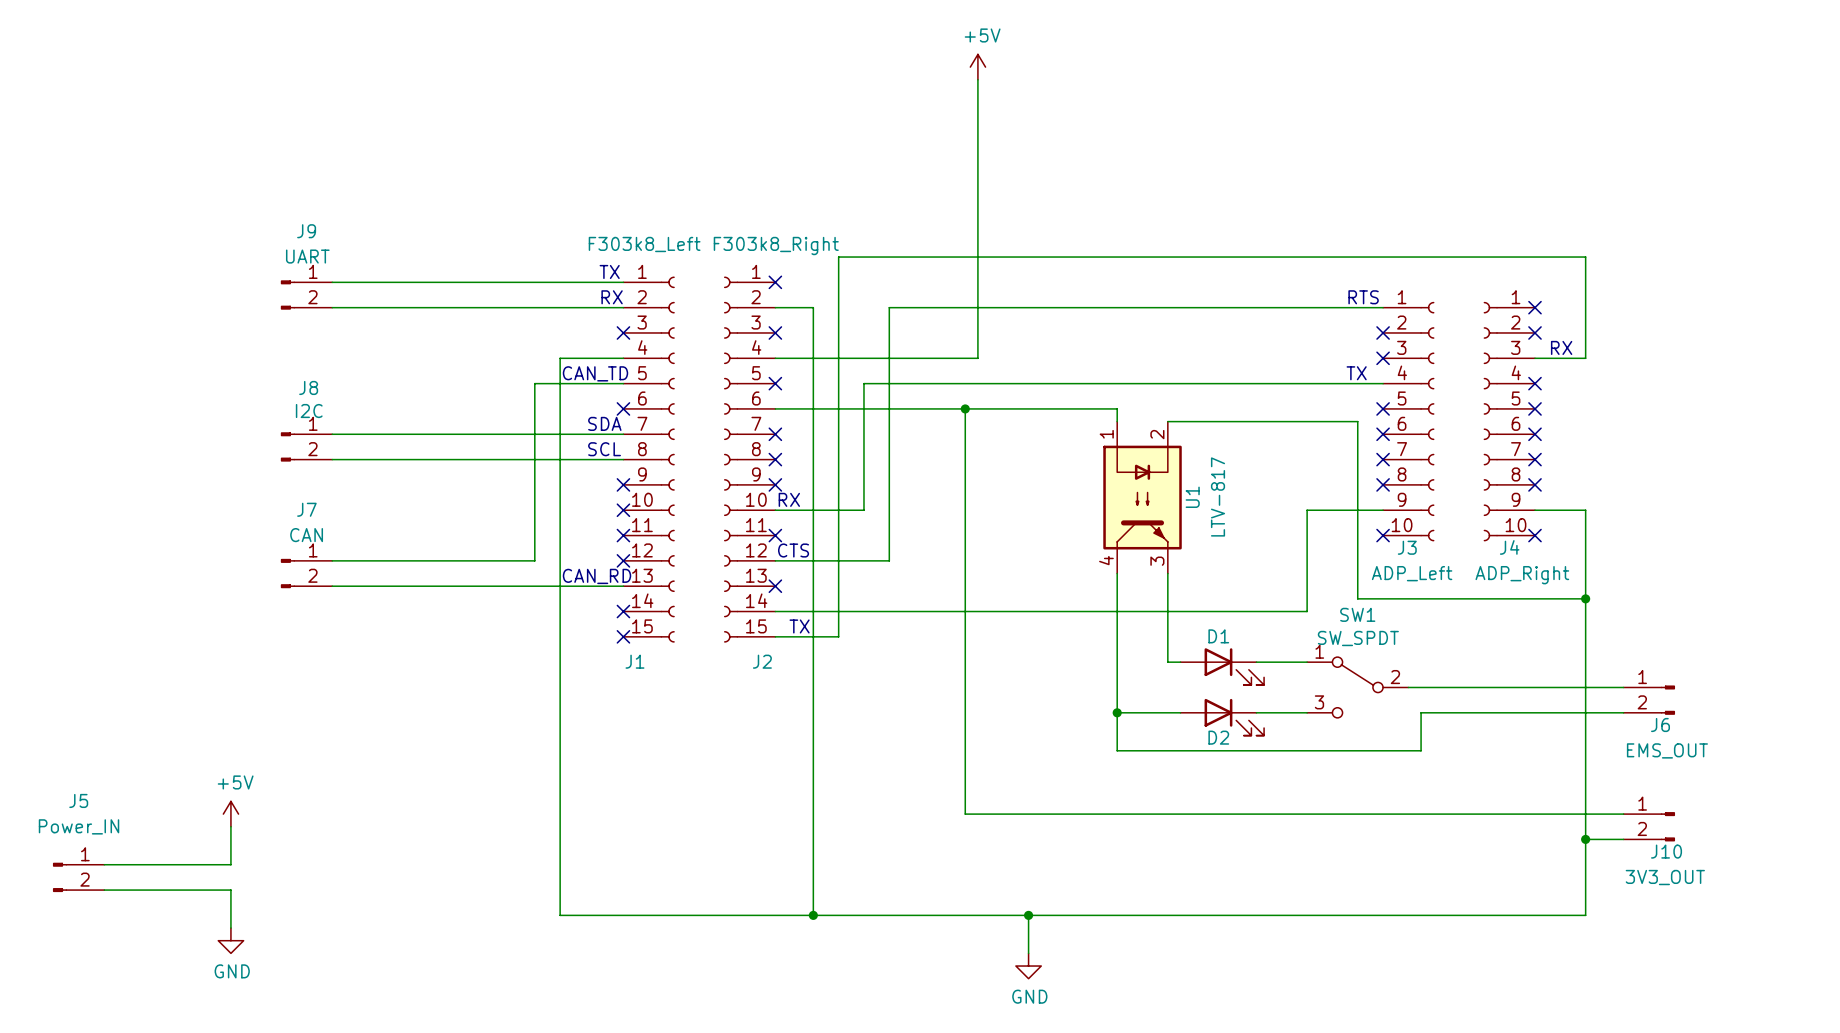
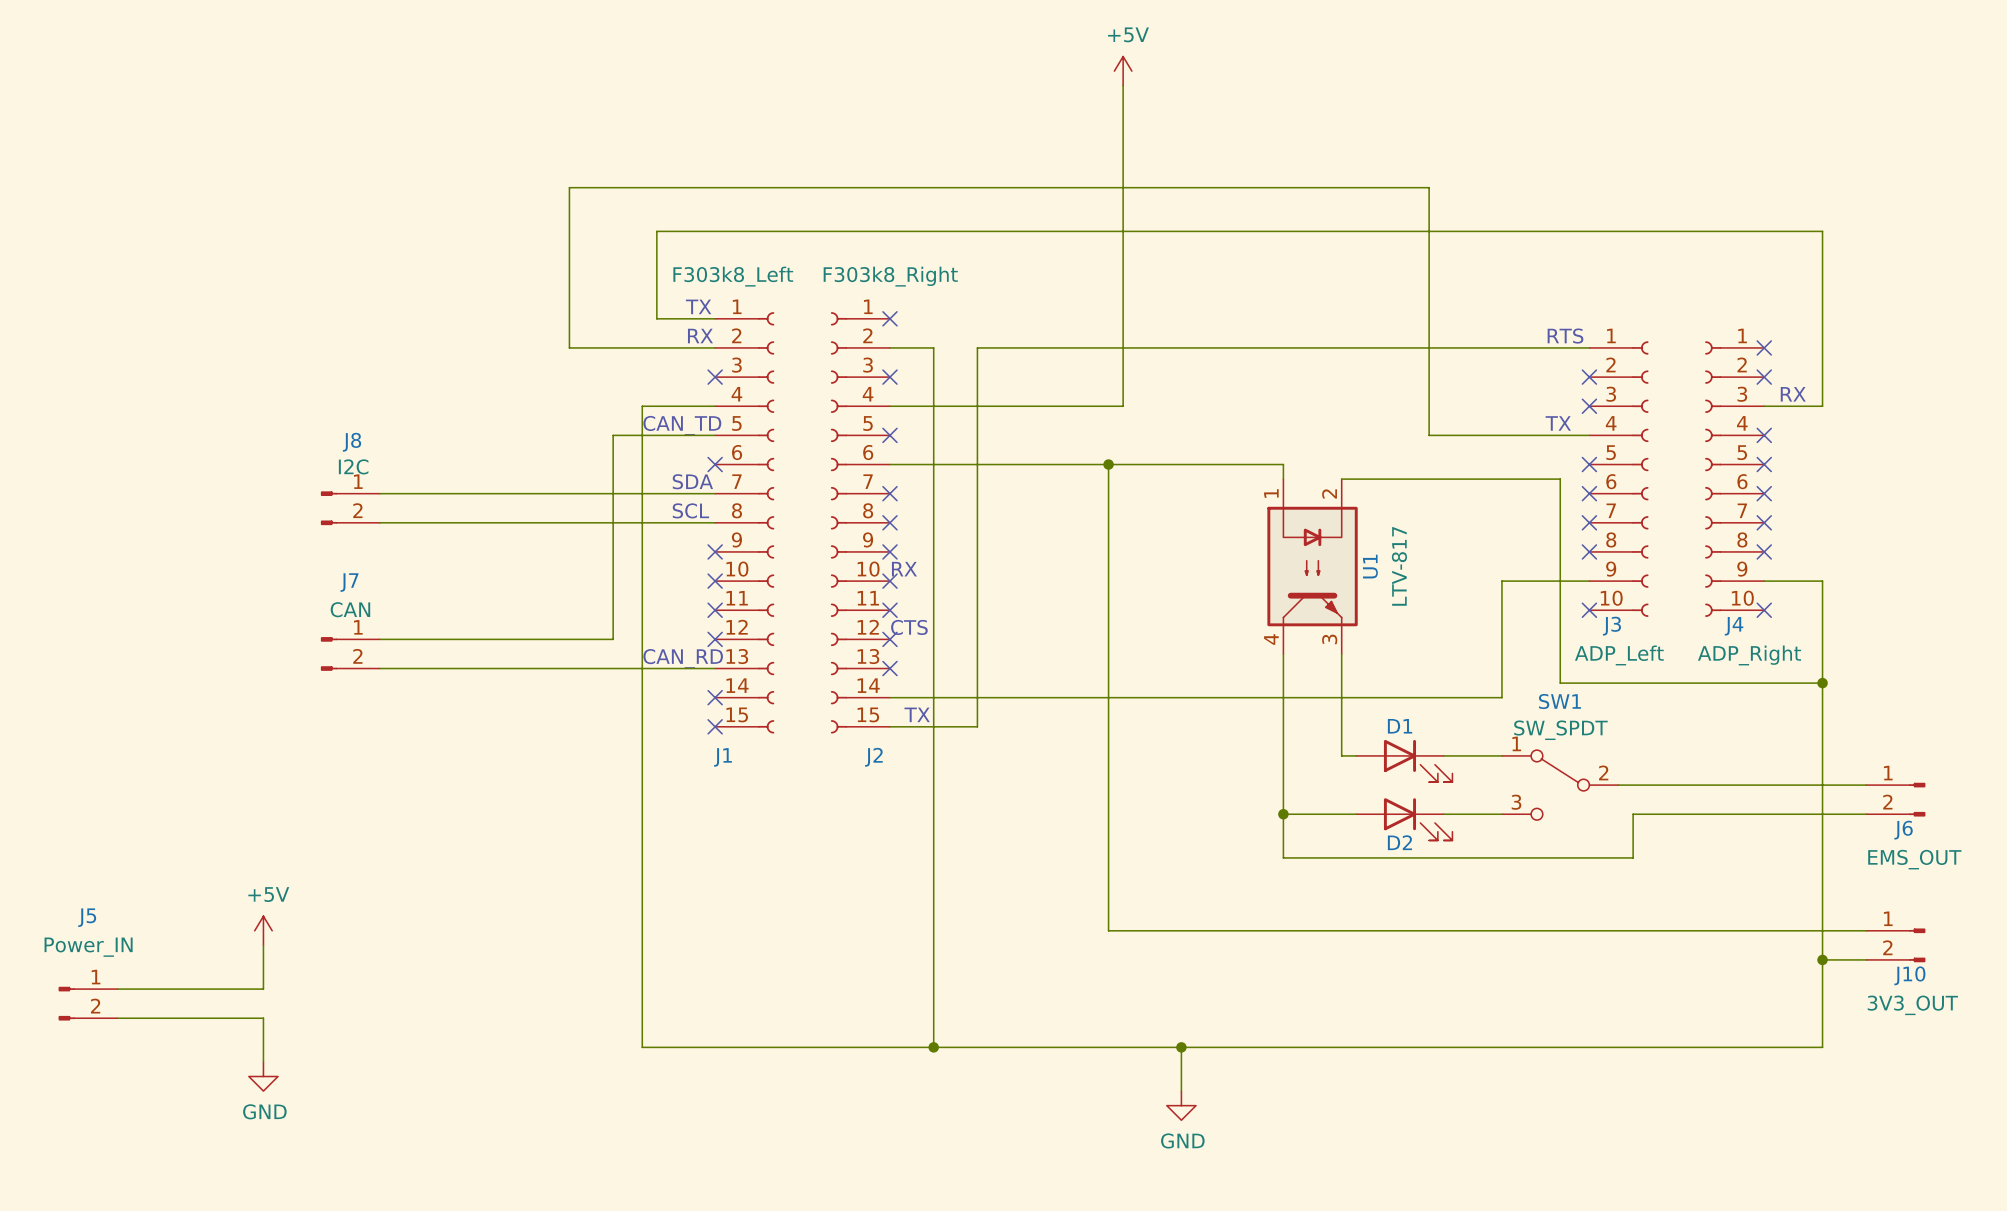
wire: (1585, 257) (838, 257) (838, 636) -> (1822, 289) (1822, 231) (656, 231) (656, 318)
wire: (332, 282) (572, 282) -> none
J9: UART (306, 295) -> none
wire: (332, 307) (496, 307) -> none
wire: (889, 307) (889, 560) (775, 560) -> (1021, 347) (977, 347) (977, 726) (962, 726)
wire: (1243, 383) (863, 383) (863, 510) (775, 510) -> (1429, 435) (1429, 187) (569, 187) (569, 347)
no-connect mark: none -> (889, 581)
no-connect mark: none -> (889, 639)

